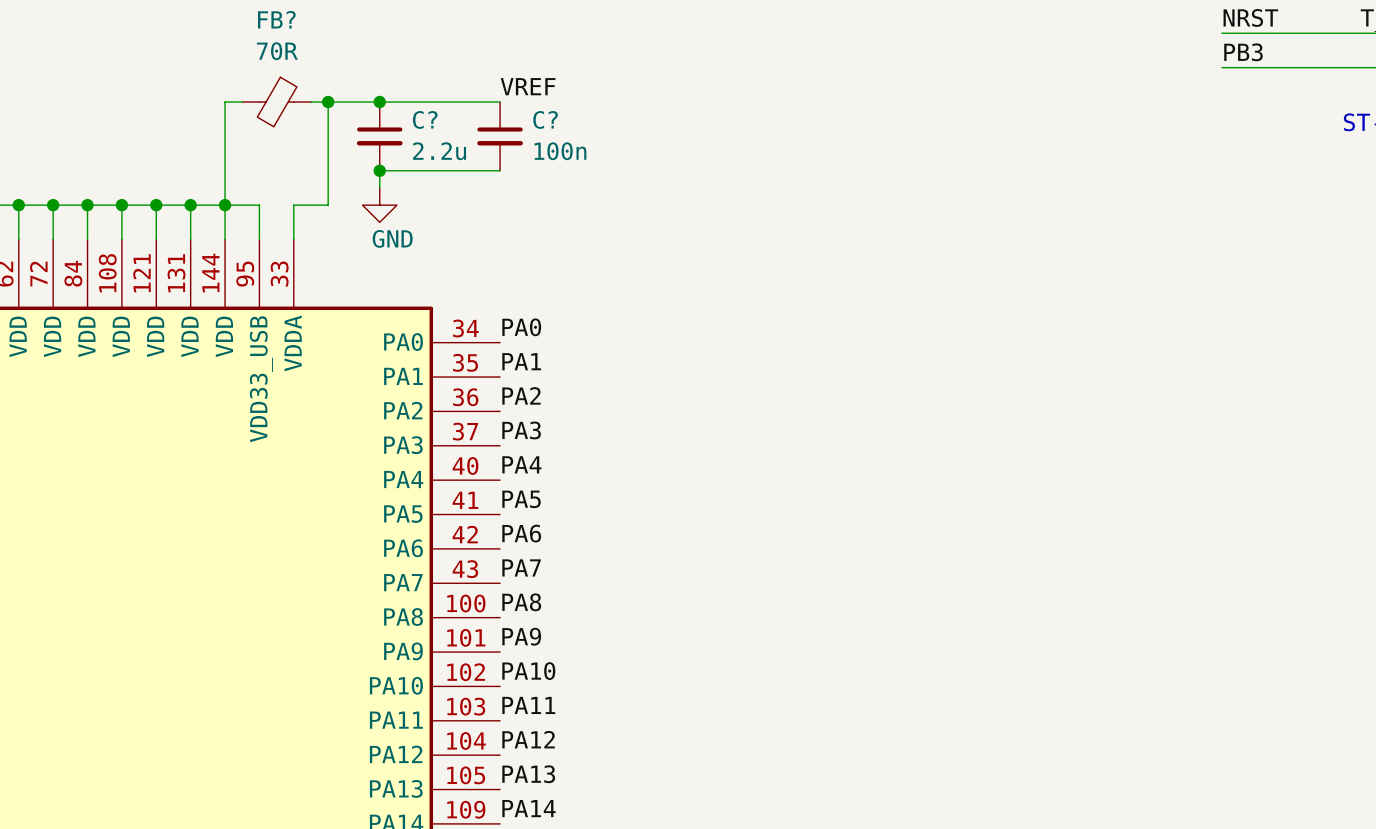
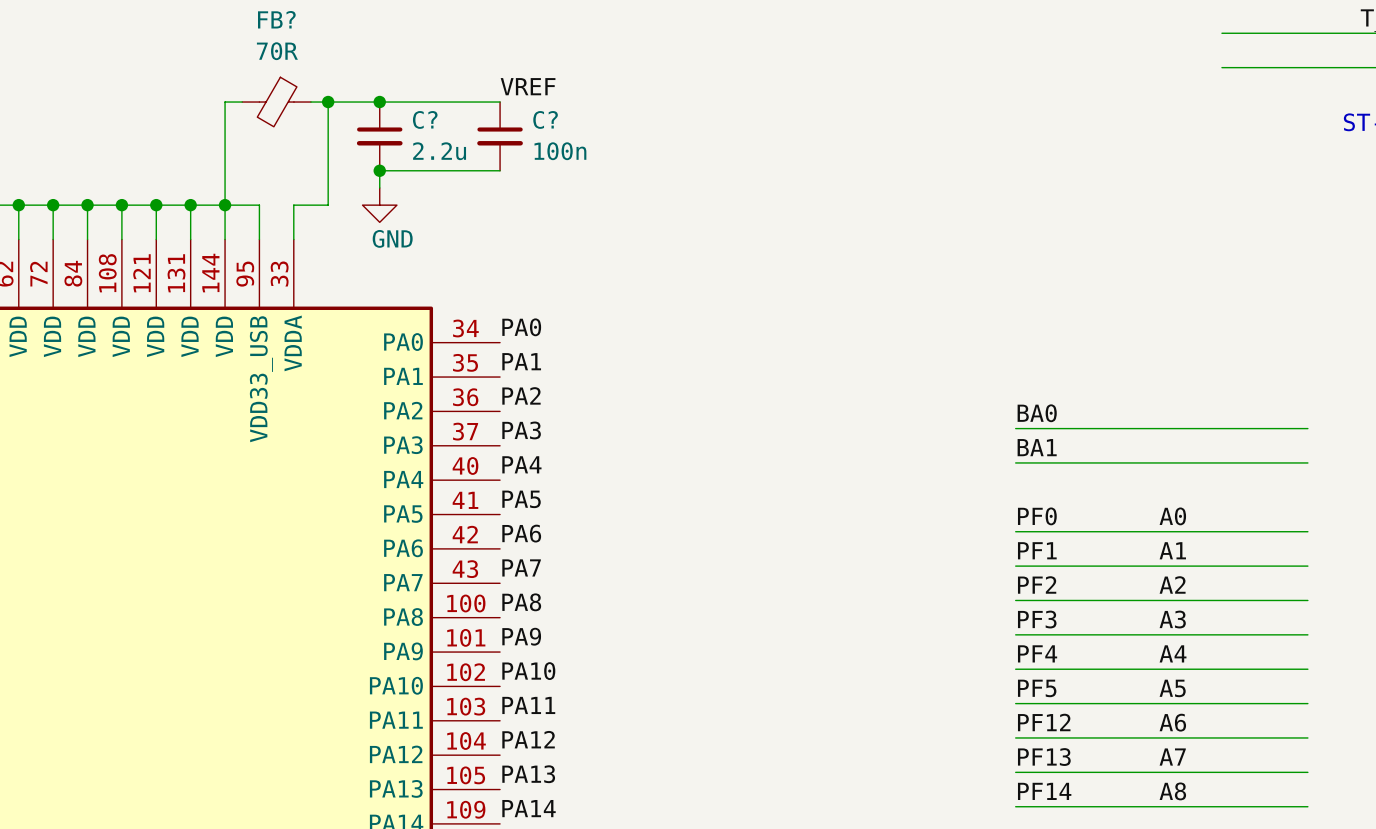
label: NRST (1250, 17) -> none
label: PB3 (1243, 52) -> none
label: none -> BA0 (1037, 413)
wire: none -> (1015, 428) (1307, 428)
label: none -> BA1 (1037, 447)
wire: none -> (1015, 462) (1307, 462)
label: none -> PF0 (1037, 516)
label: none -> A0 (1172, 516)
wire: none -> (1015, 531) (1307, 531)
label: none -> PF1 (1037, 550)
label: none -> A1 (1172, 550)
wire: none -> (1015, 566) (1307, 566)
label: none -> PF2 (1037, 584)
label: none -> A2 (1172, 584)
wire: none -> (1015, 600) (1307, 600)
label: none -> PF3 (1037, 619)
label: none -> A3 (1172, 619)
wire: none -> (1015, 634) (1307, 634)
label: none -> PF4 (1037, 653)
label: none -> A4 (1173, 653)
wire: none -> (1015, 669) (1307, 669)
label: none -> PF5 (1037, 688)
label: none -> A5 (1172, 688)
wire: none -> (1015, 703) (1307, 703)
label: none -> PF12 (1044, 722)
label: none -> A6 (1172, 722)
wire: none -> (1015, 737) (1307, 737)
label: none -> PF13 (1044, 757)
label: none -> A7 (1172, 757)
wire: none -> (1015, 772) (1307, 772)
label: none -> PF14 (1044, 791)
label: none -> A8 (1172, 791)
wire: none -> (1015, 806) (1307, 806)

